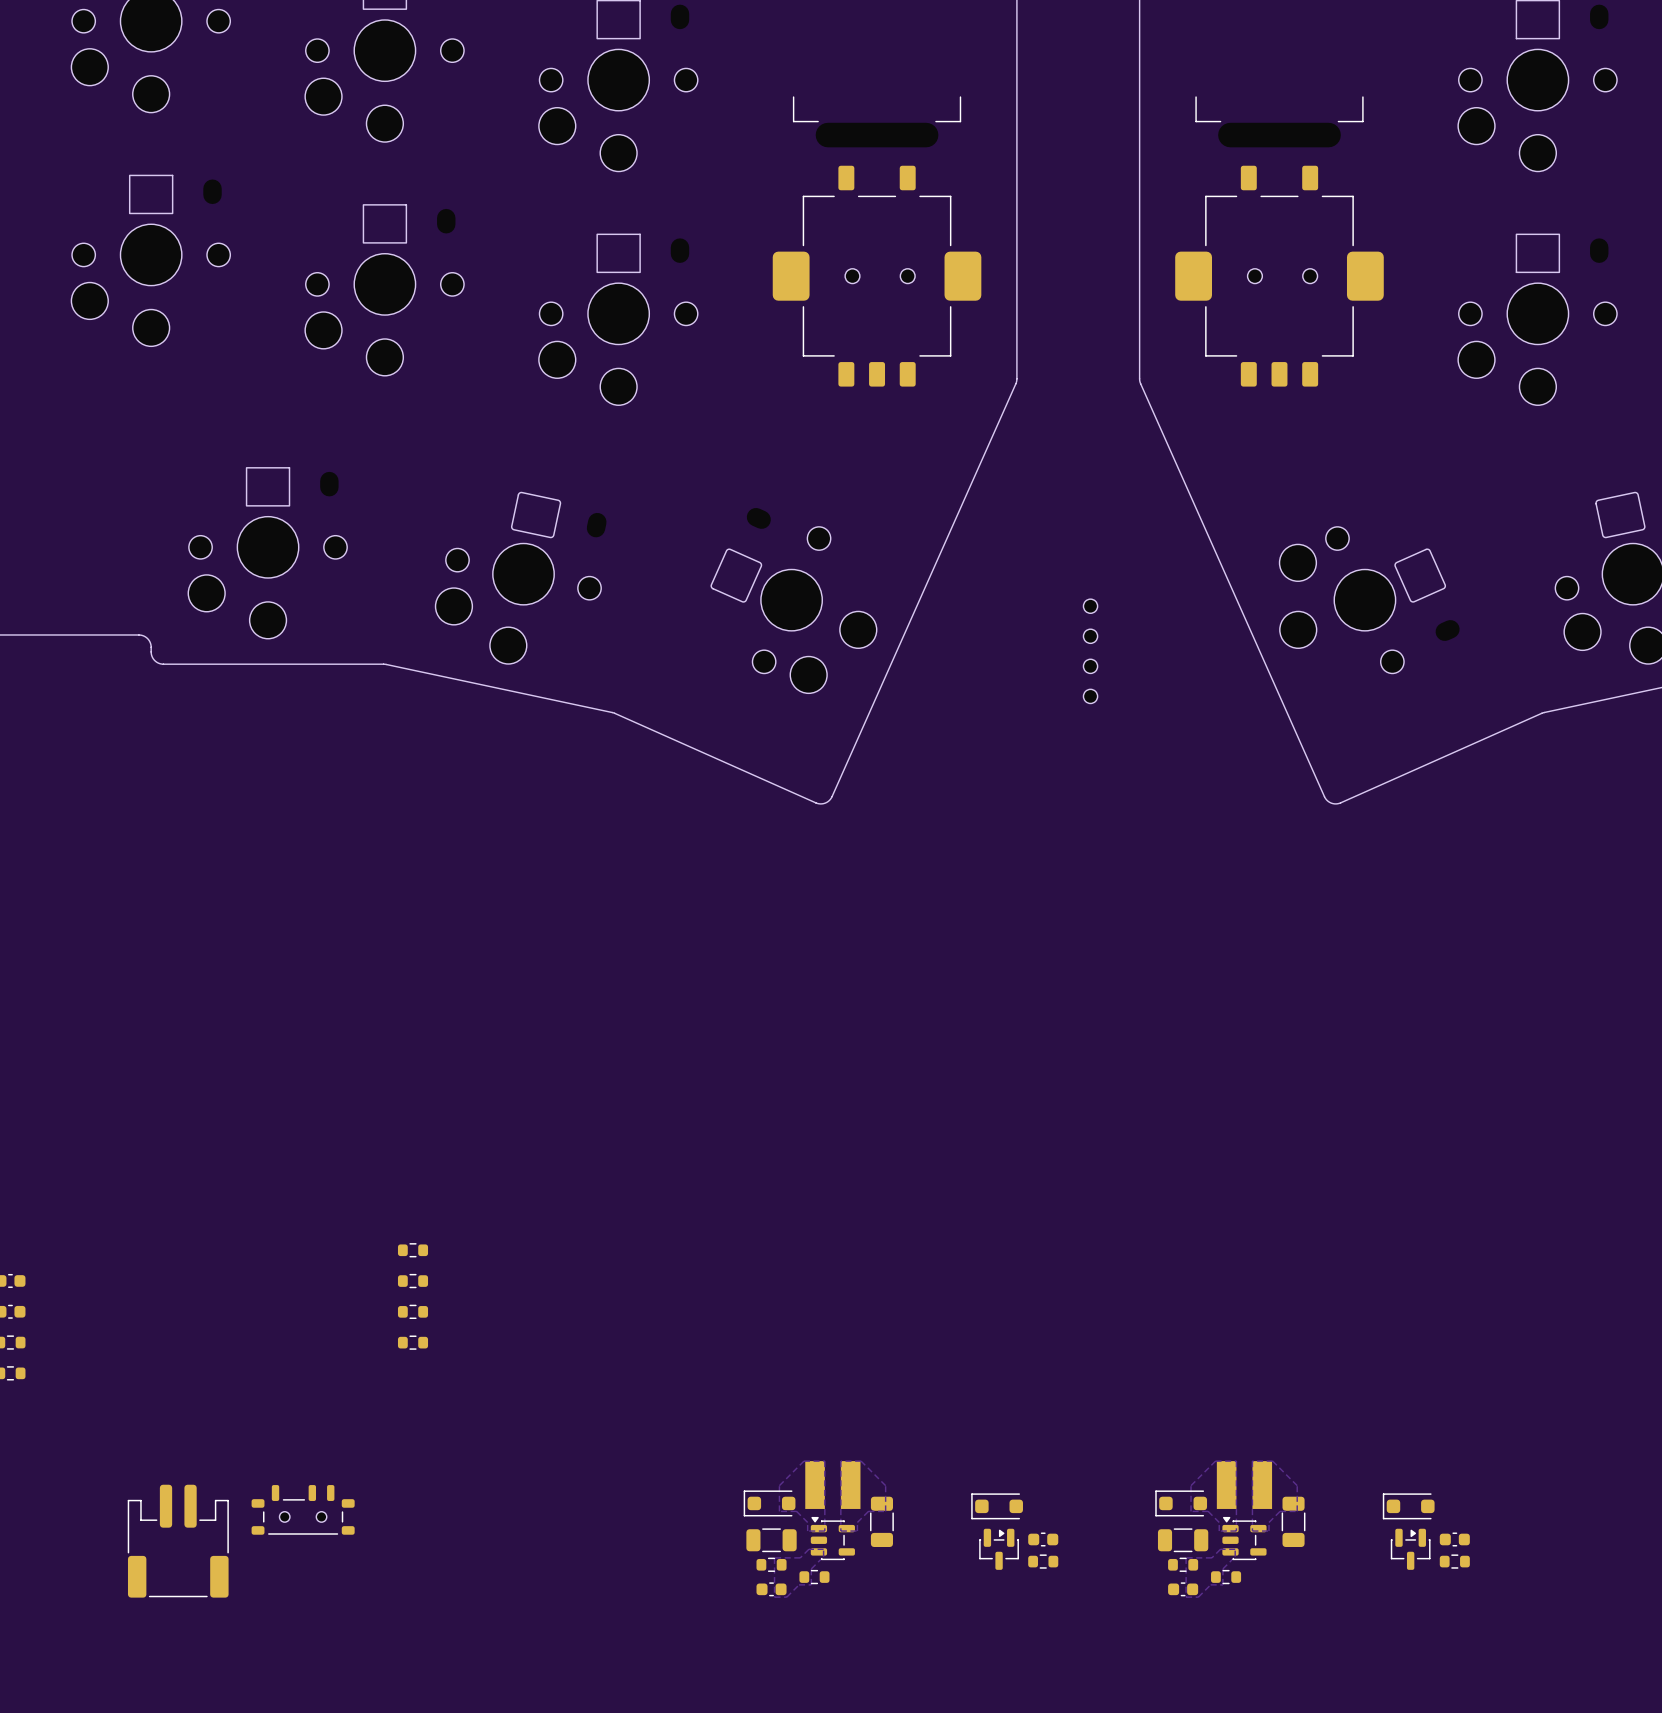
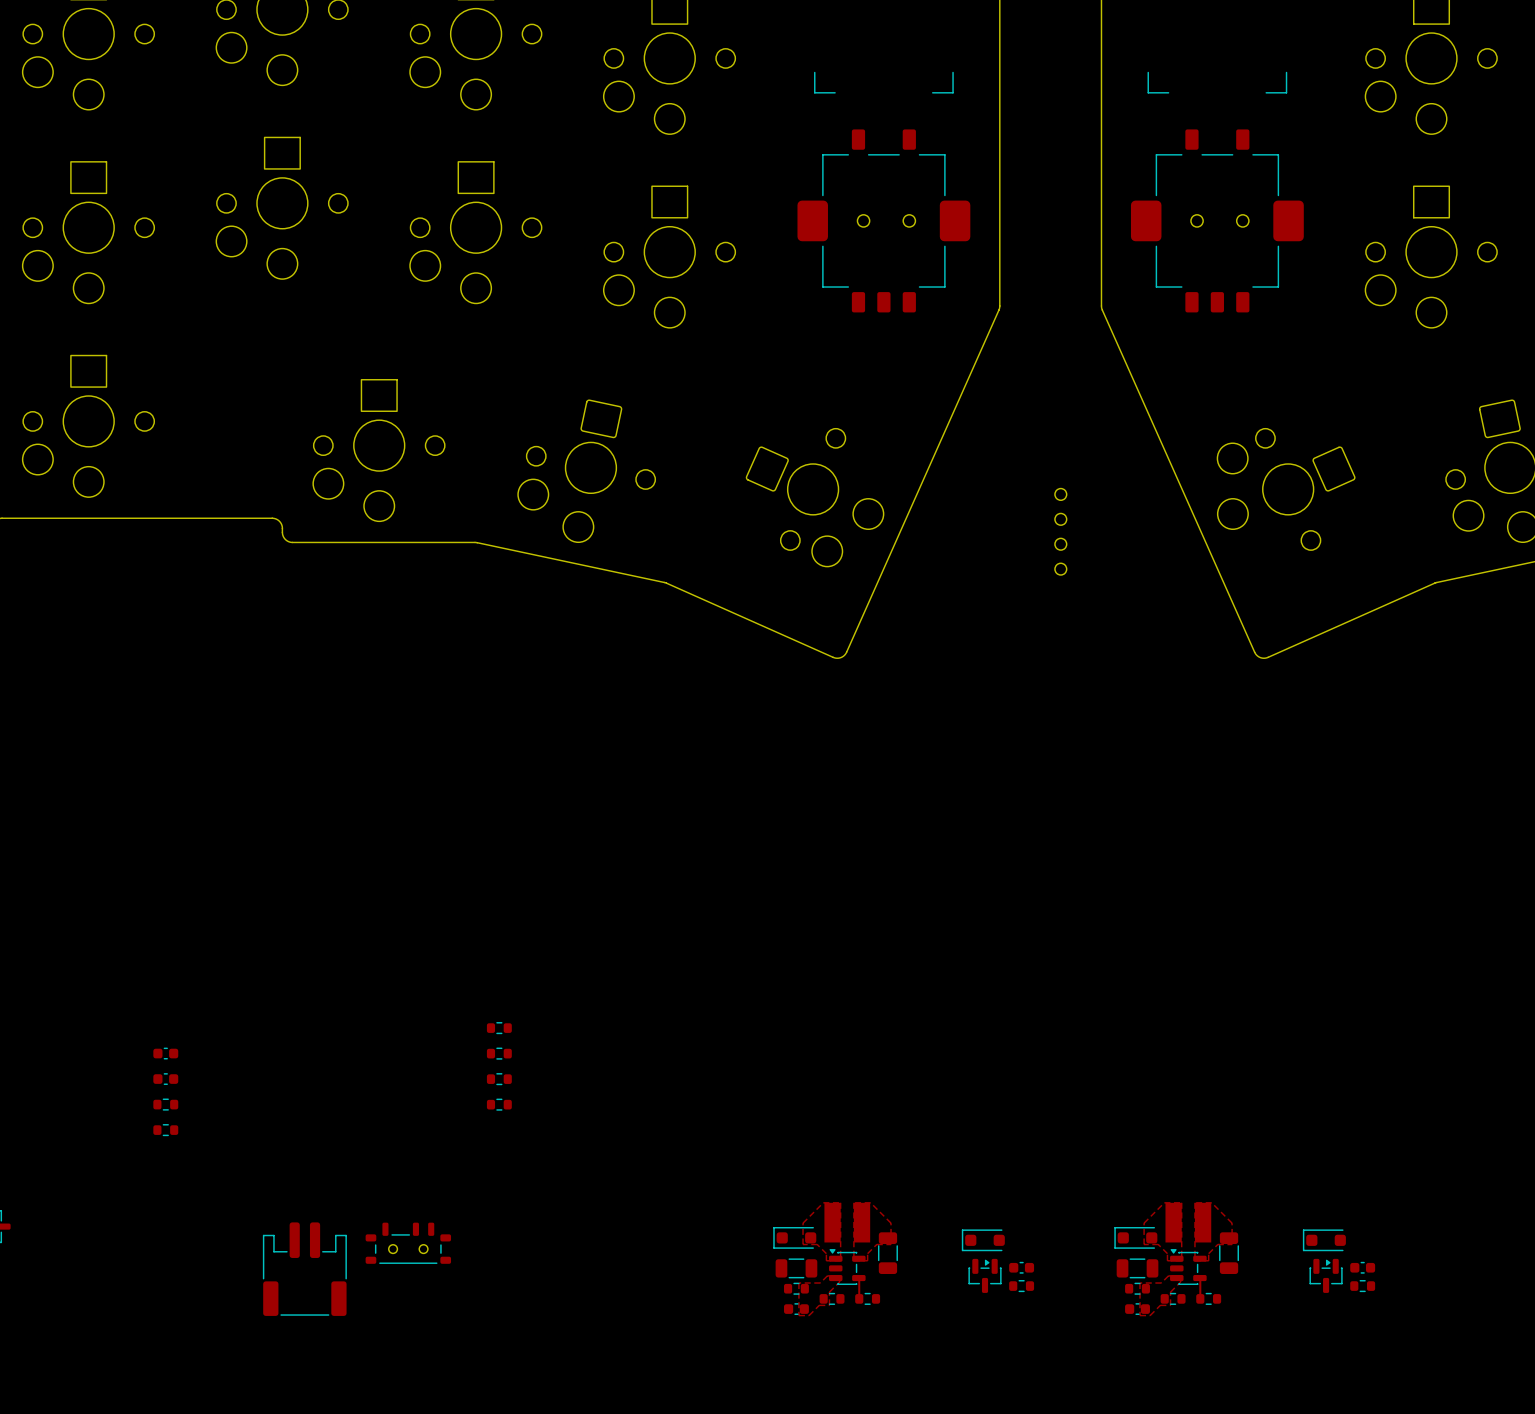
track: none -> (859, 1278) (859, 1298)
track: none -> (1200, 1278) (1200, 1298)
part: none -> (867, 1298)
part: none -> (1208, 1298)

